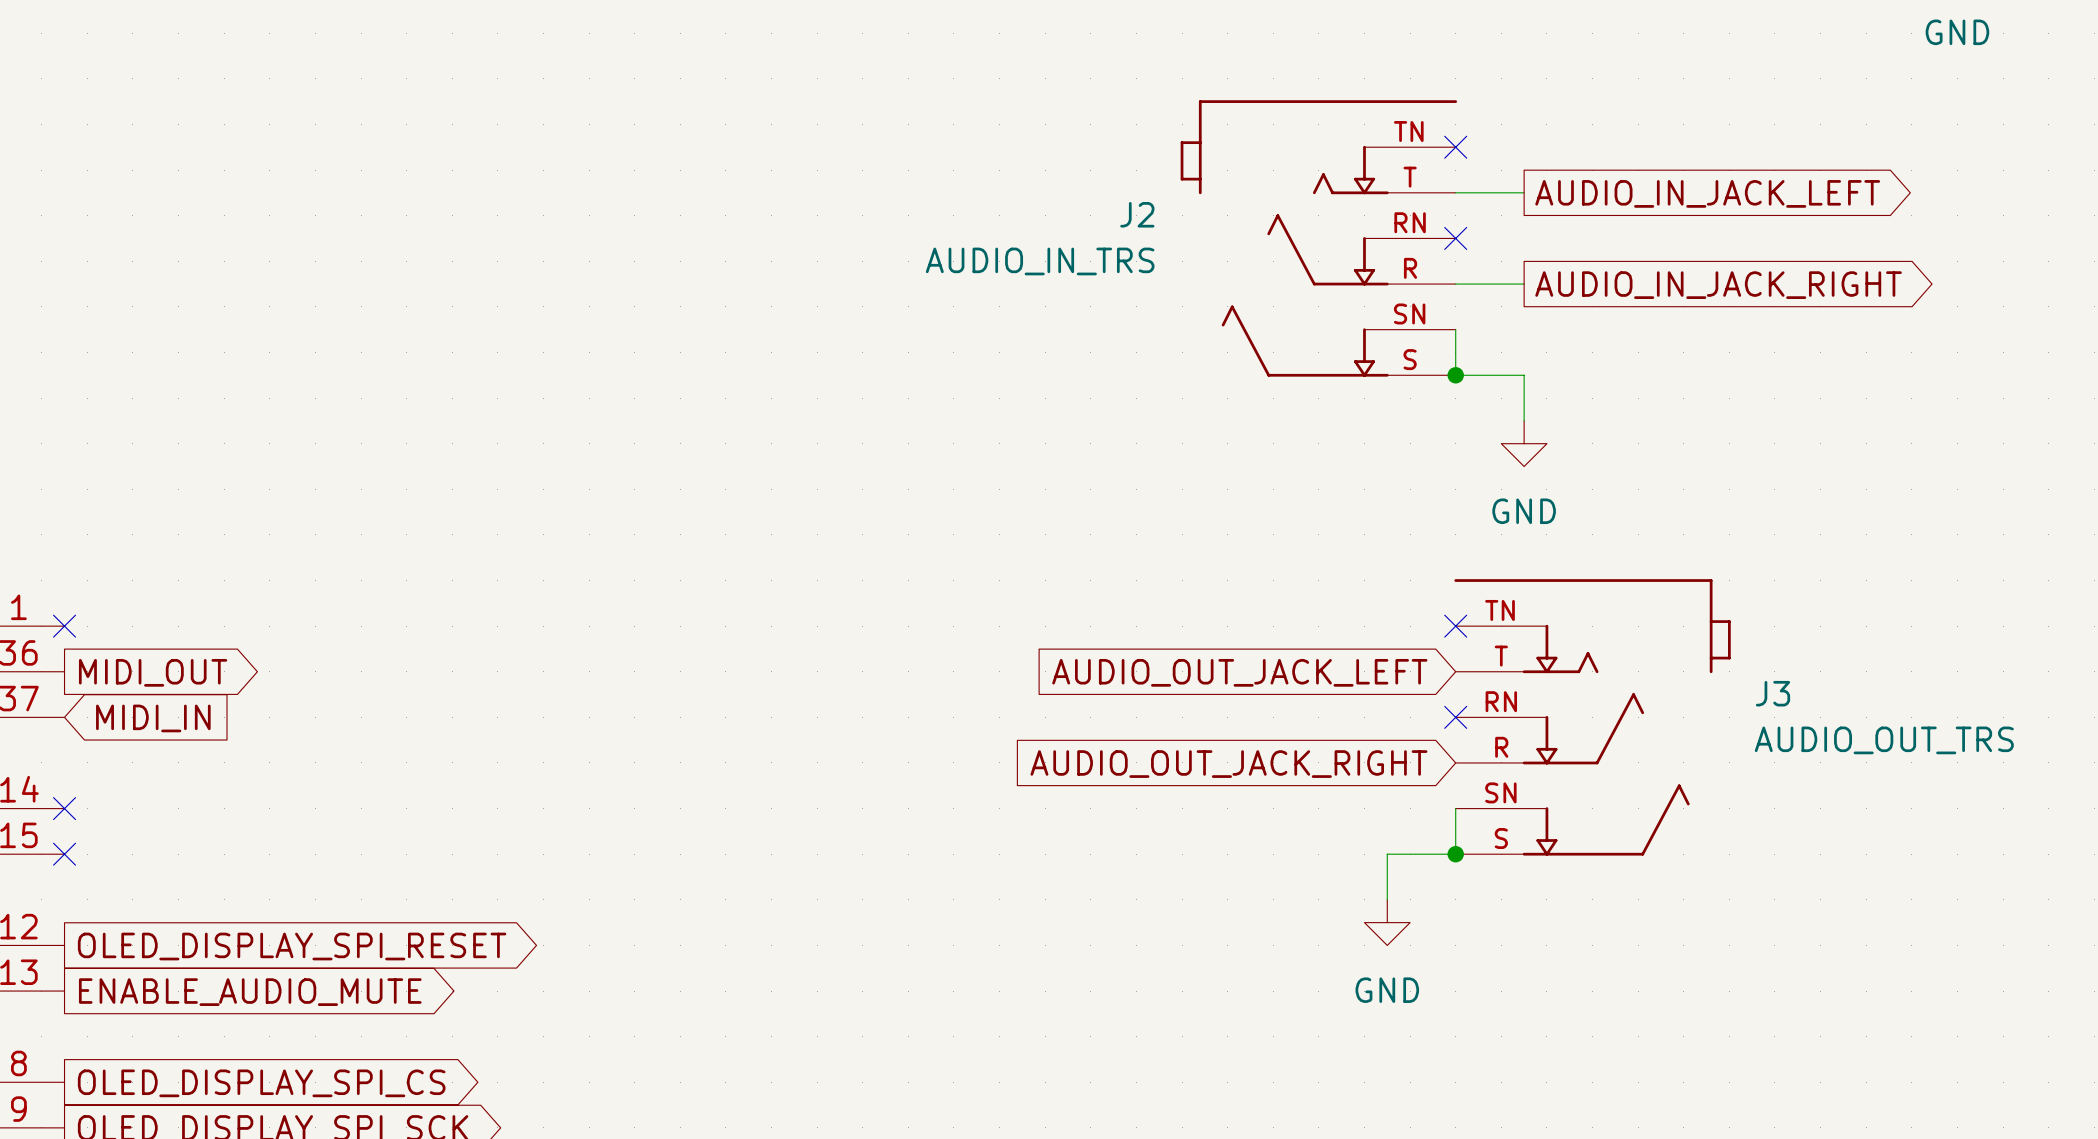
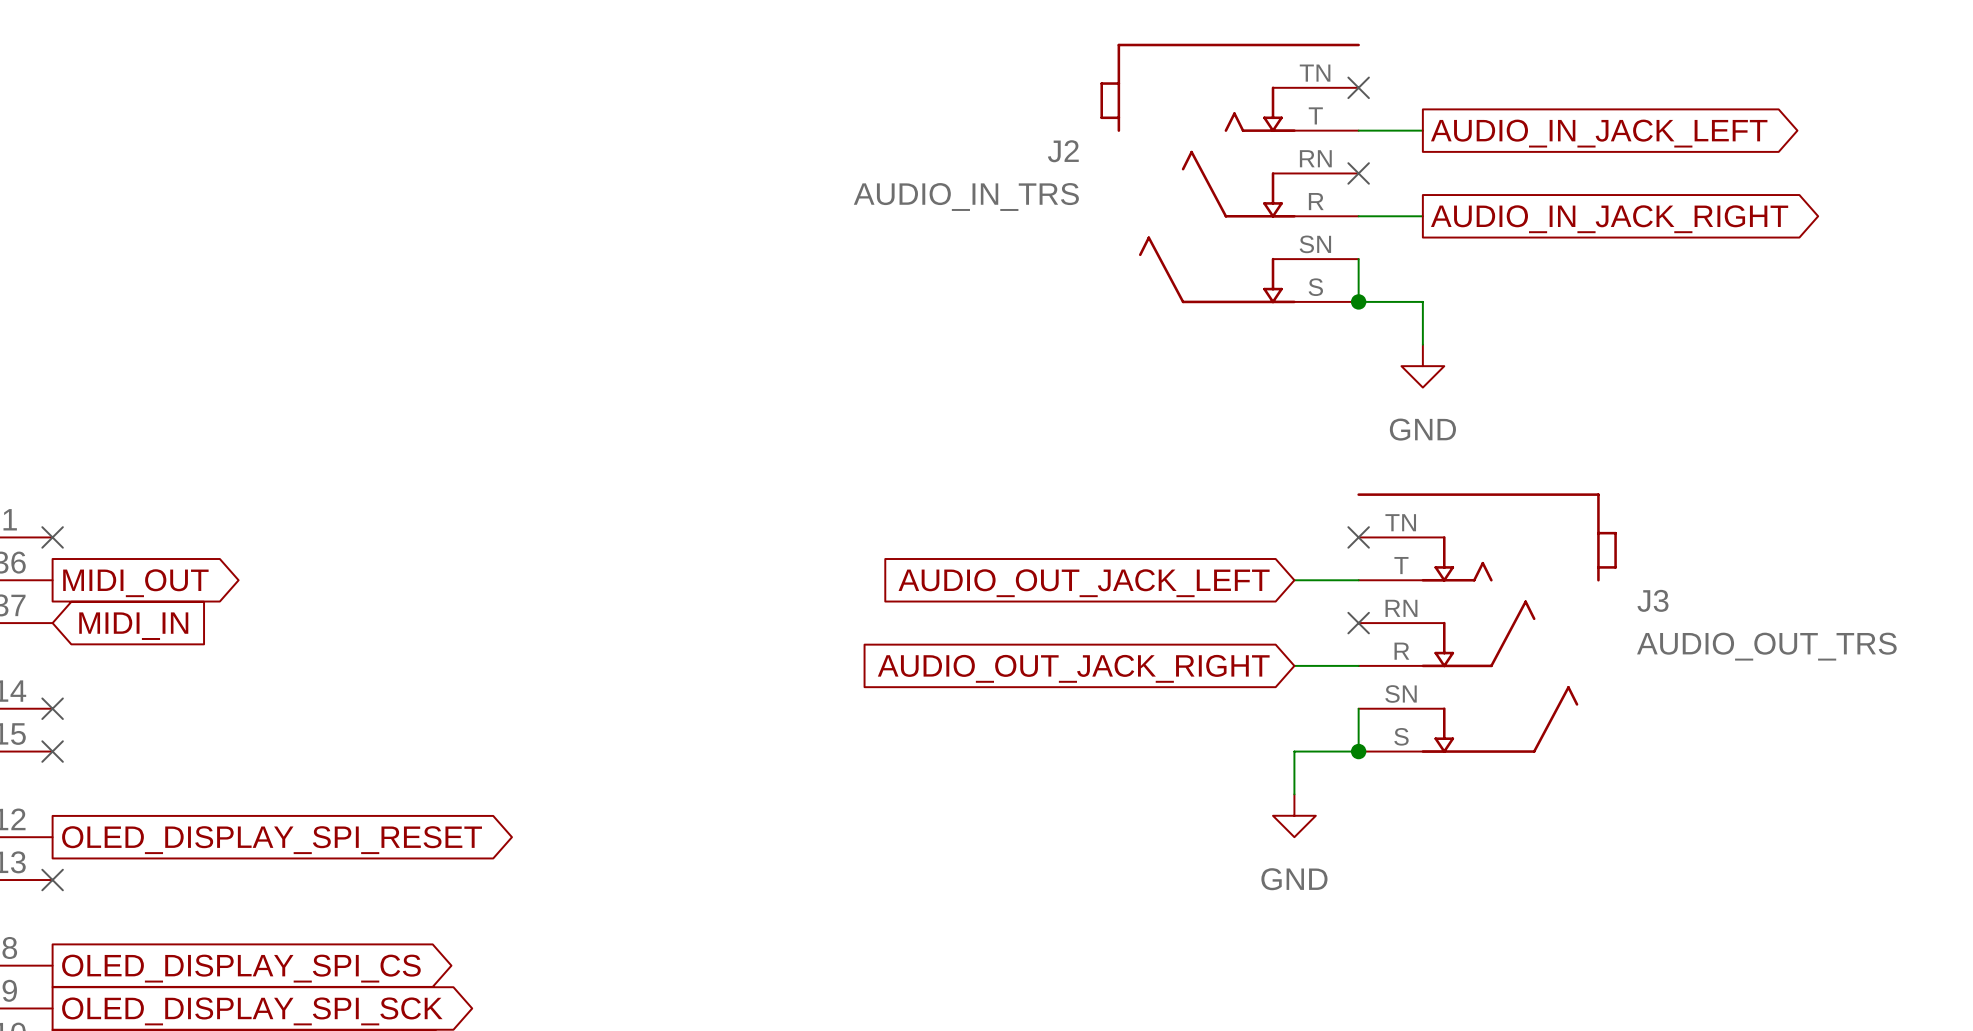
wire: none -> (1294, 580) (1358, 580)
global label position: AUDIO_OUT_JACK_LEFT (1239, 672) -> AUDIO_OUT_JACK_LEFT (1084, 583)
wire: none -> (1294, 665) (1358, 665)
global label position: AUDIO_OUT_JACK_RIGHT (1228, 764) -> AUDIO_OUT_JACK_RIGHT (1073, 668)
no-connect mark: none -> (52, 880)
global label: ENABLE_AUDIO_MUTE (250, 992) -> none

